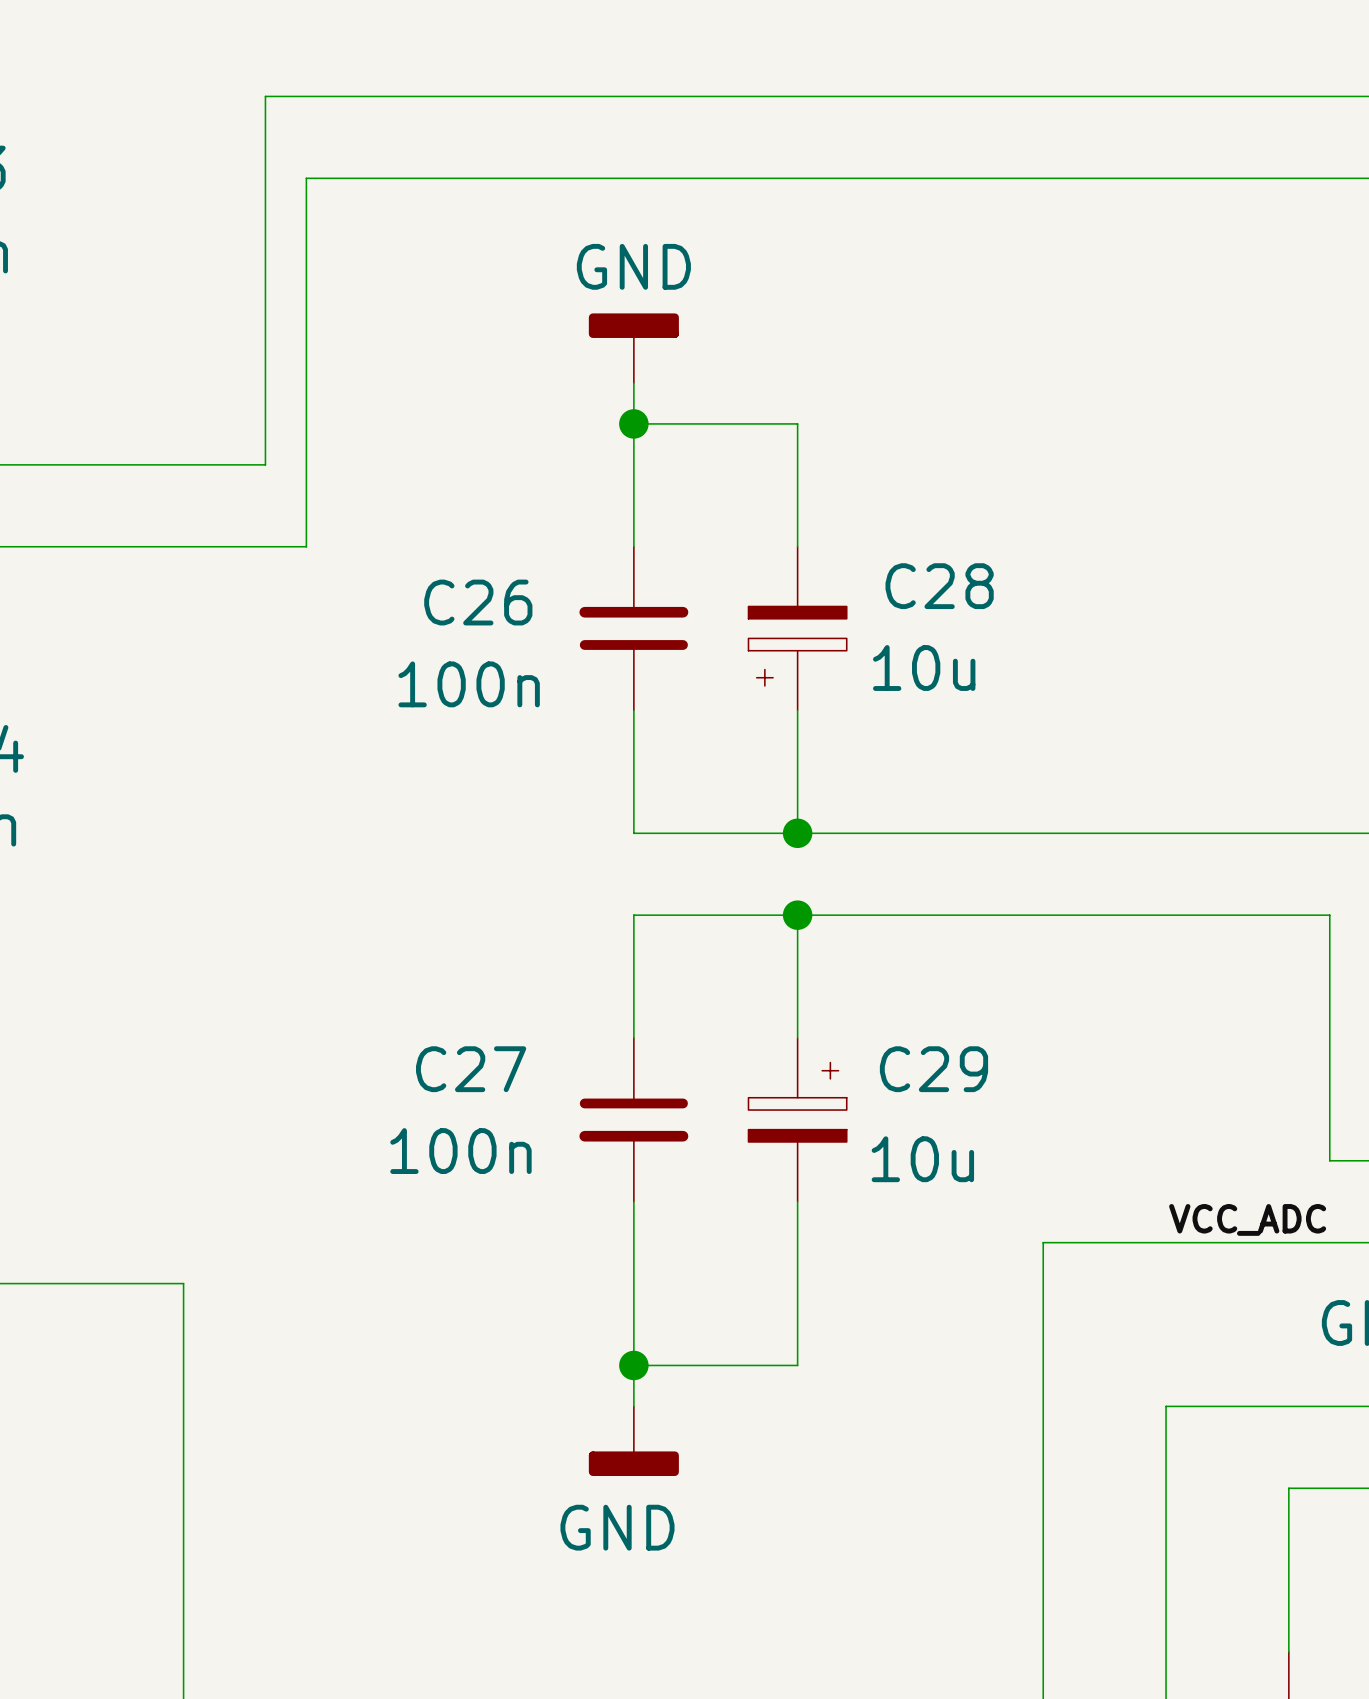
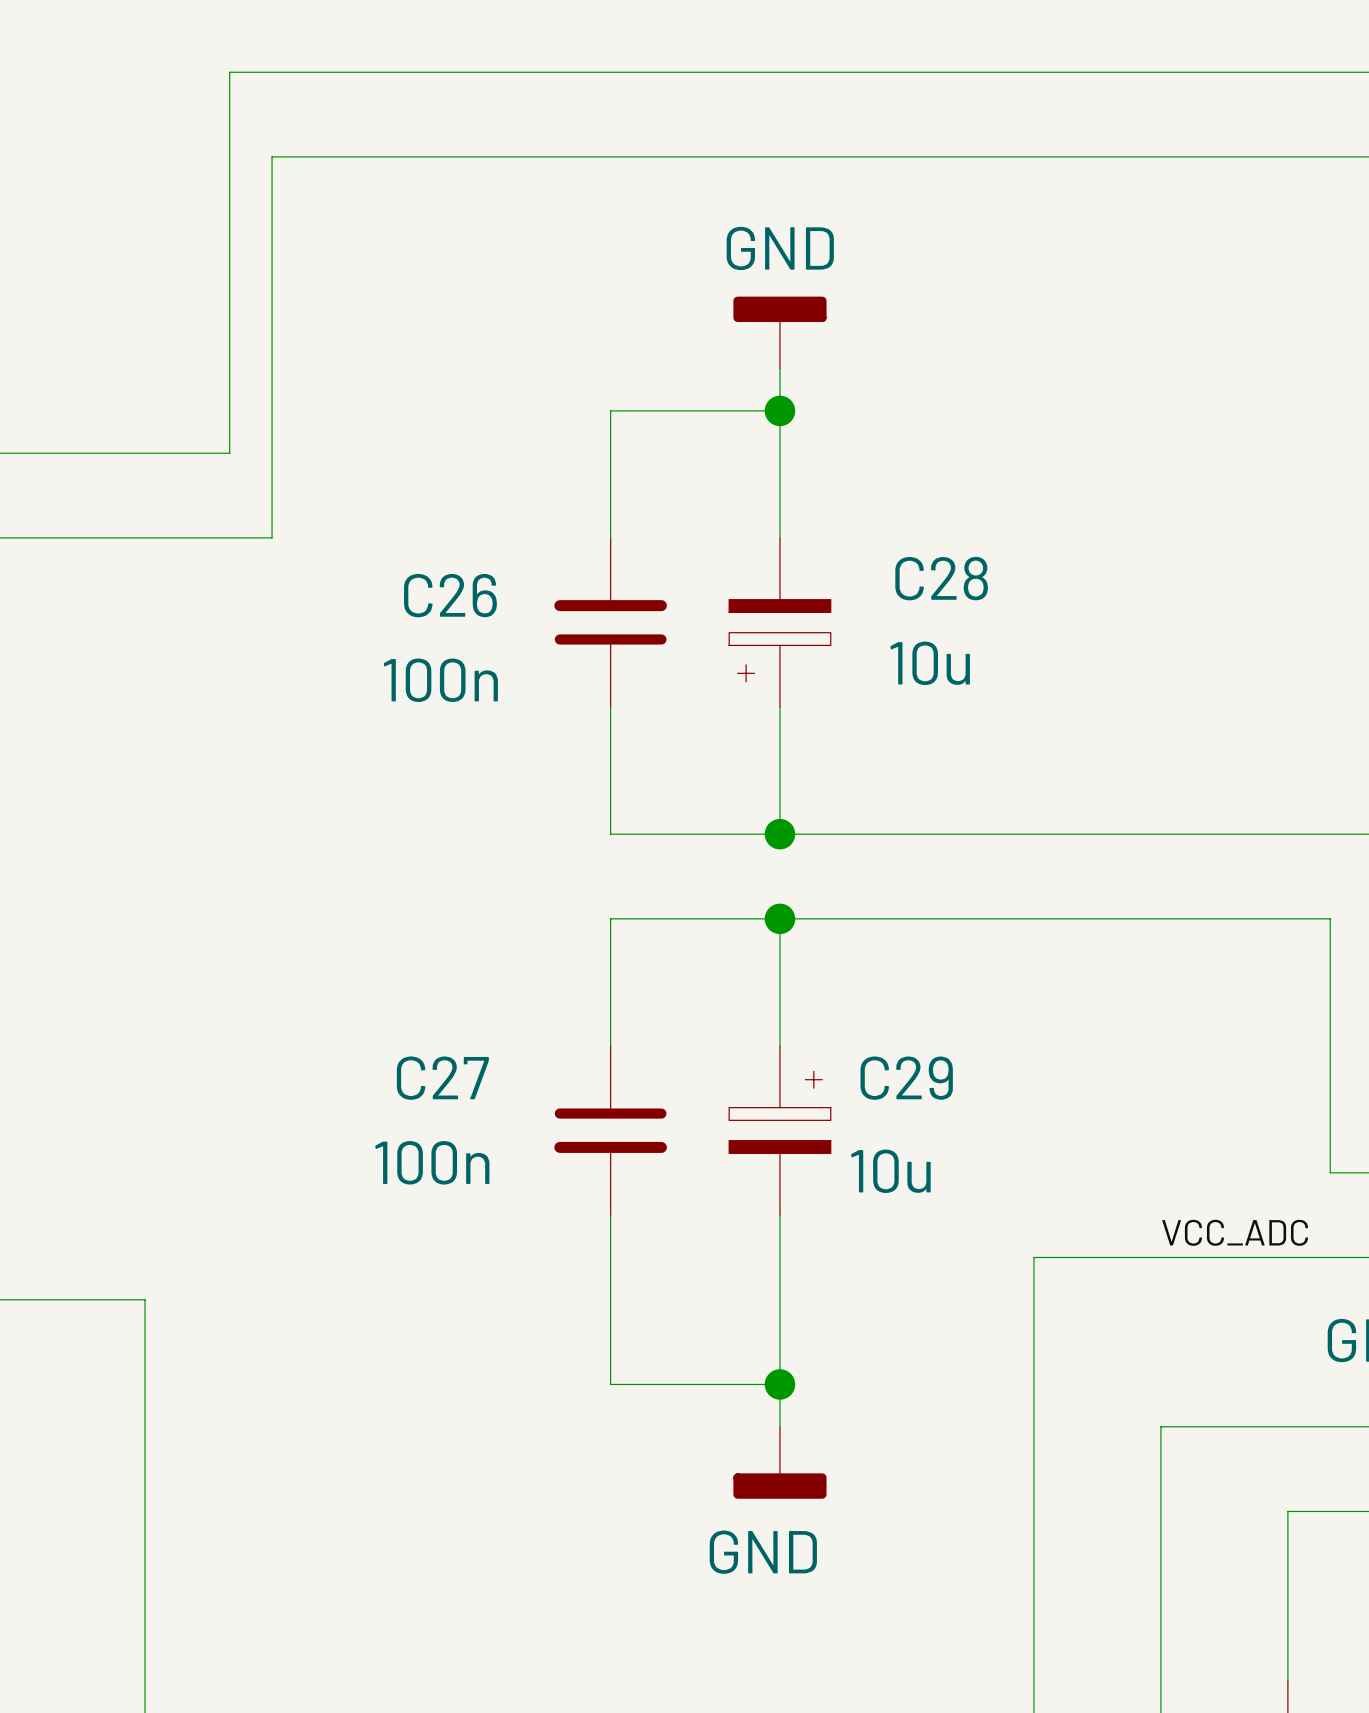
power symbol position: GND (633, 348) -> GND (779, 332)
wire: (633, 383) (633, 423) -> (779, 368) (779, 410)
junction position: (633, 423) -> (779, 410)
wire: (633, 1365) (633, 1406) -> (779, 1384) (779, 1426)
junction position: (633, 1365) -> (779, 1384)
power symbol position: GND (633, 1441) -> GND (779, 1462)

